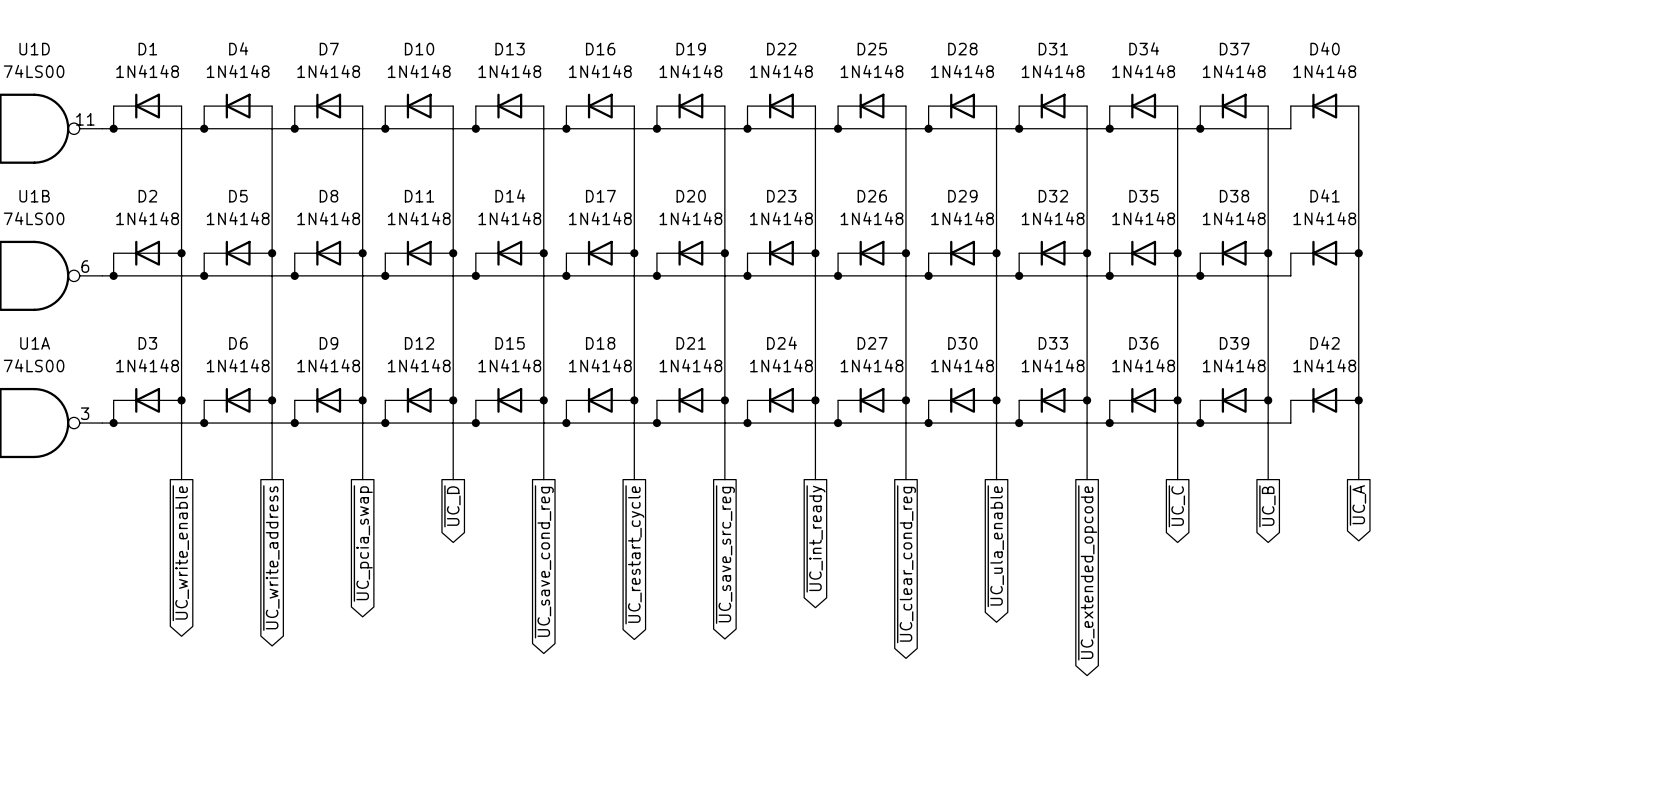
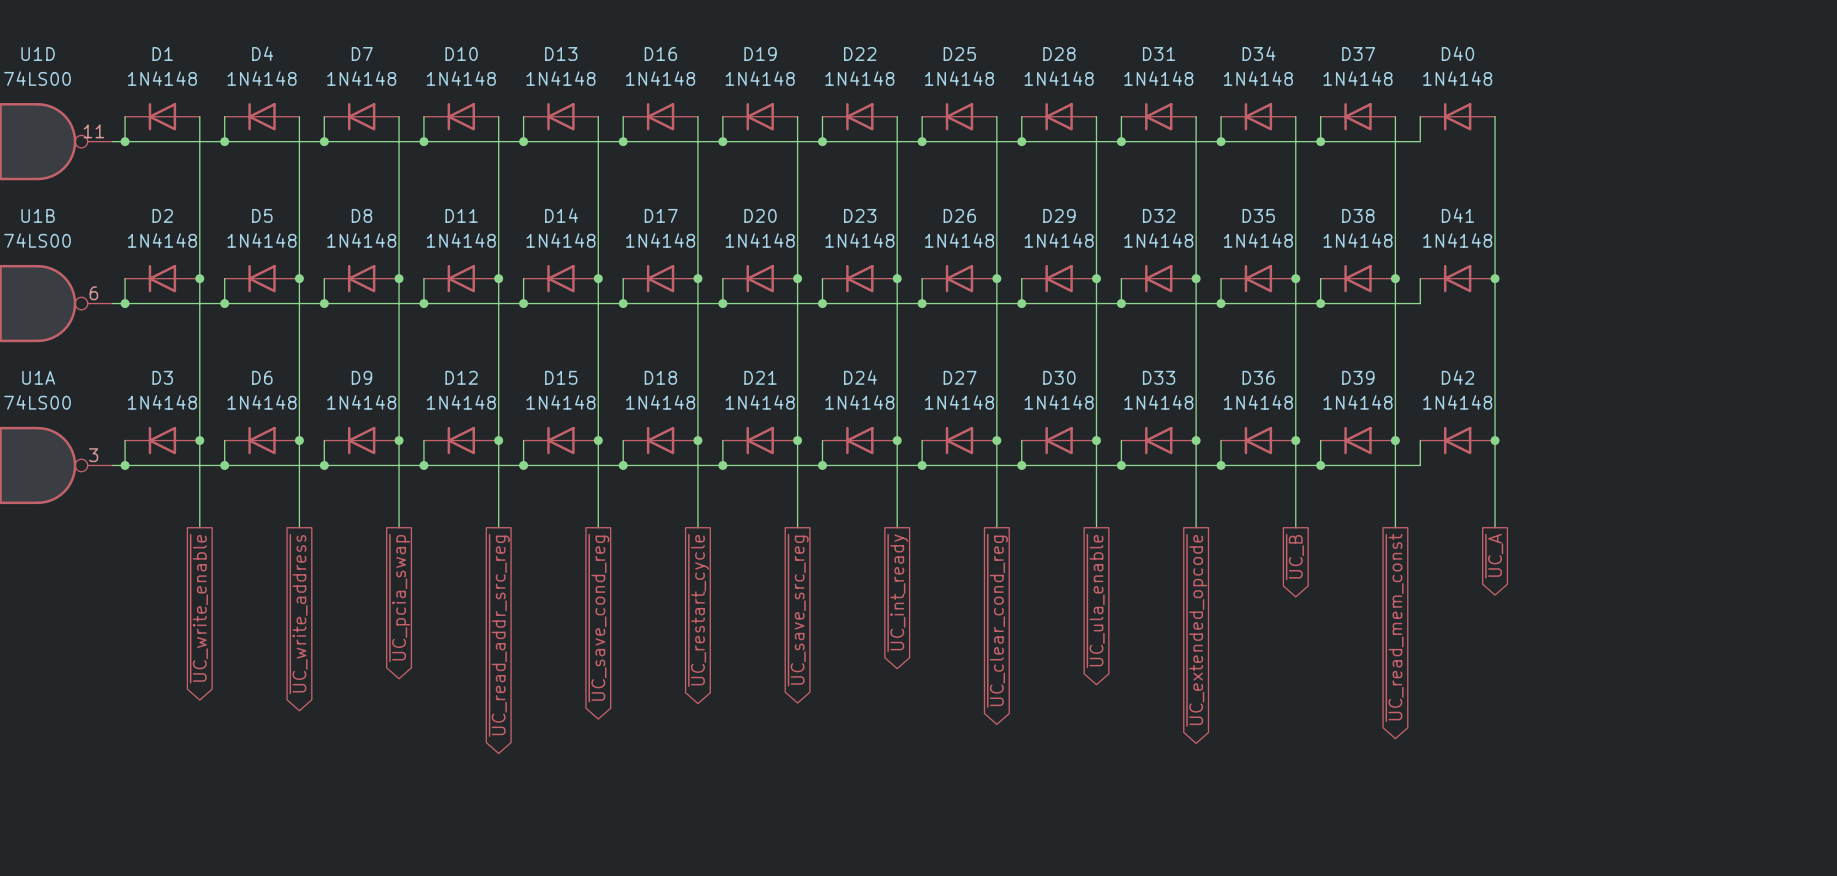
global label: ~{UC_D} (452, 506) -> ~{UC_read_addr_src_reg} (499, 635)
global label: ~{UC_C} (1176, 506) -> ~{UC_B} (1294, 557)
global label: ~{UC_B} (1267, 506) -> ~{UC_read_mem_const} (1394, 627)

